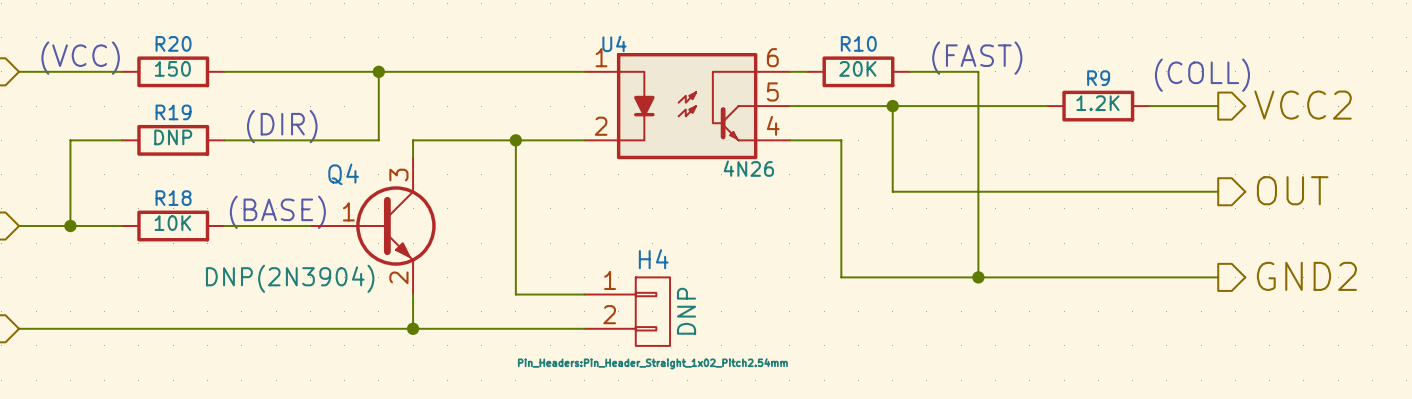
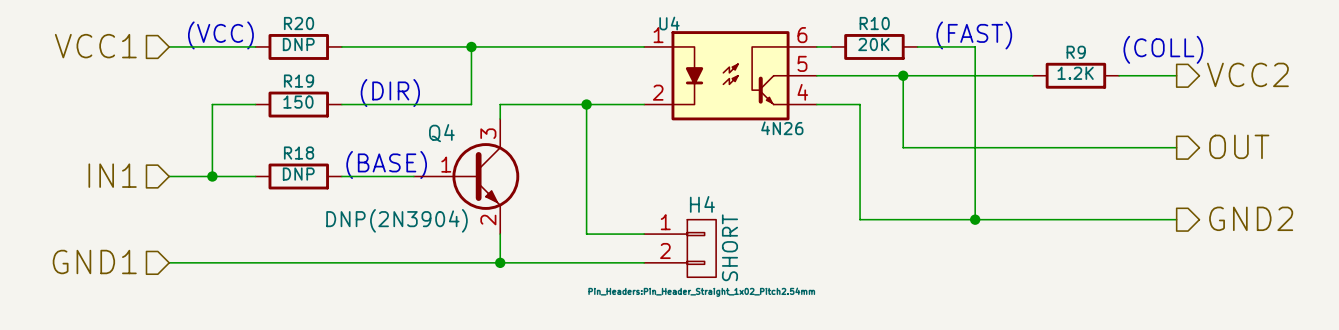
R20 value: 150 (172, 68) -> DNP (298, 44)
R19 value: DNP (173, 137) -> 150 (298, 102)
R18 value: 10K (172, 223) -> DNP (298, 174)
H4 value: DNP (686, 311) -> SHORT (729, 247)

